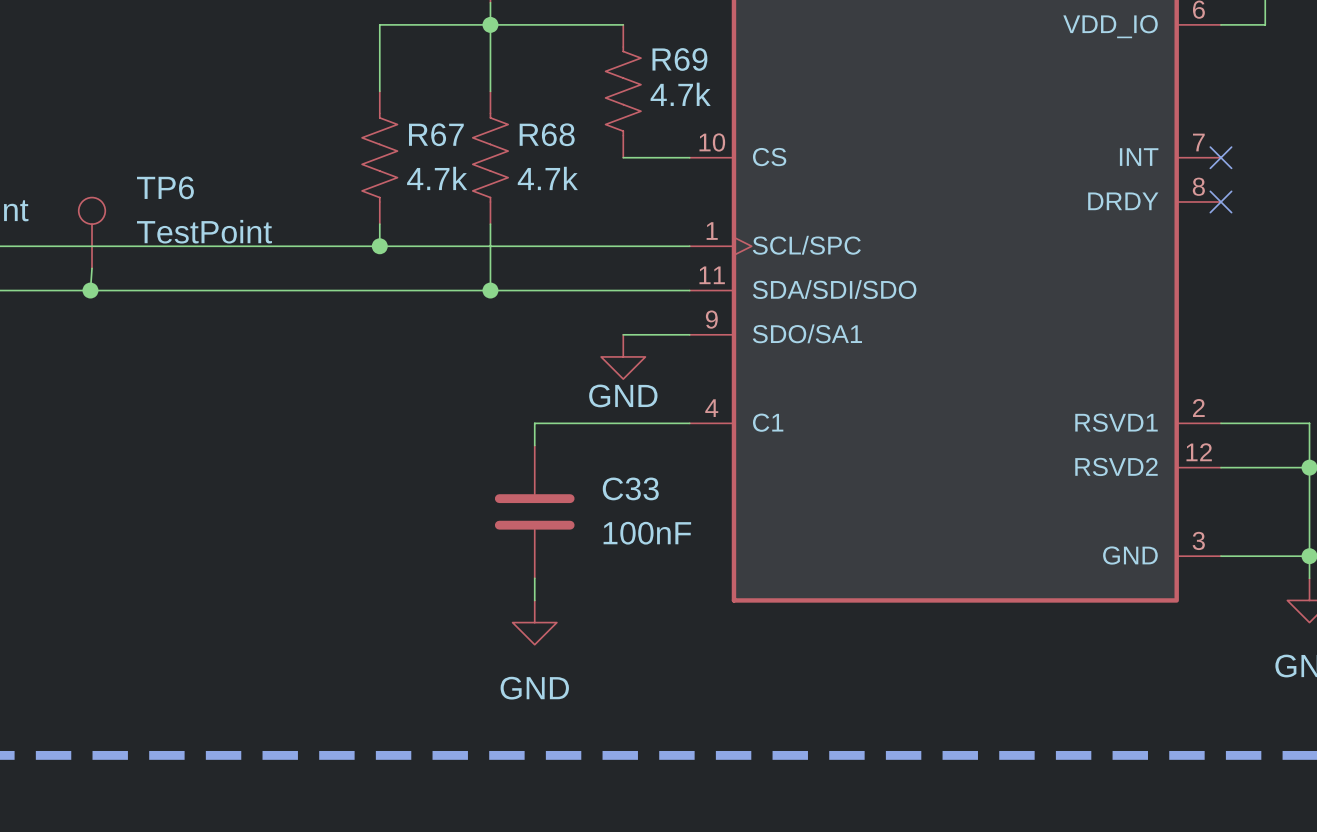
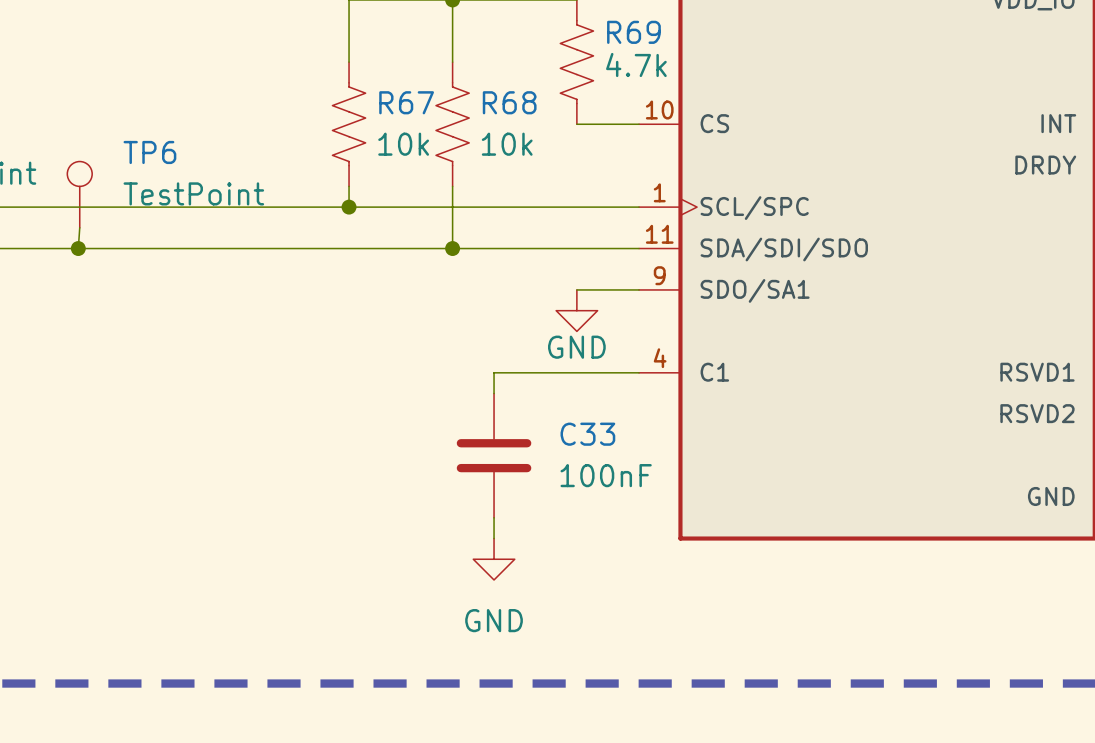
R67 value: 4.7k (437, 178) -> 10k (403, 144)
R68 value: 4.7k (547, 178) -> 10k (507, 144)

